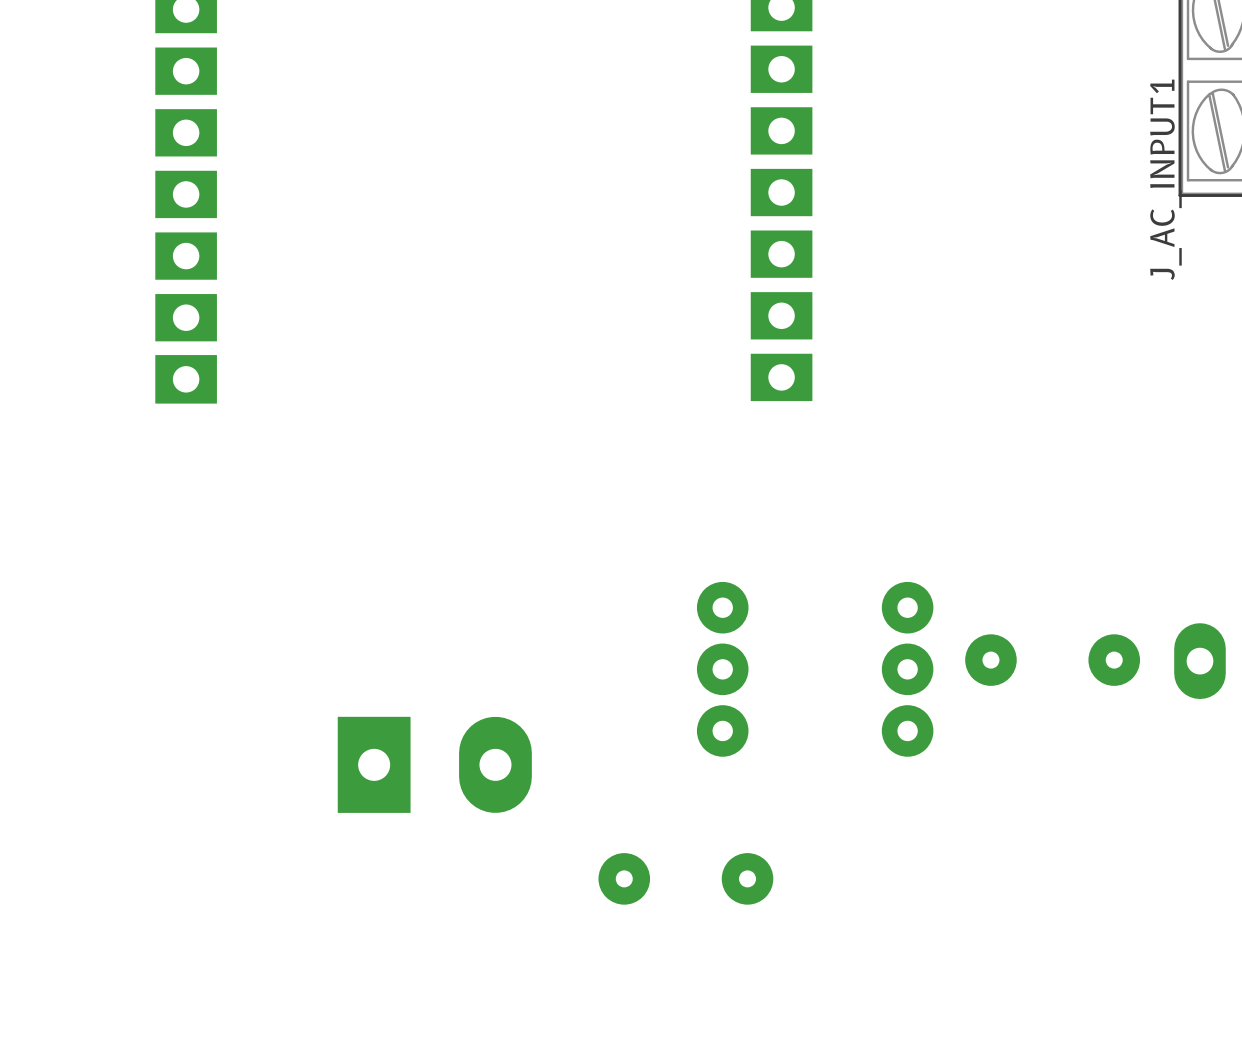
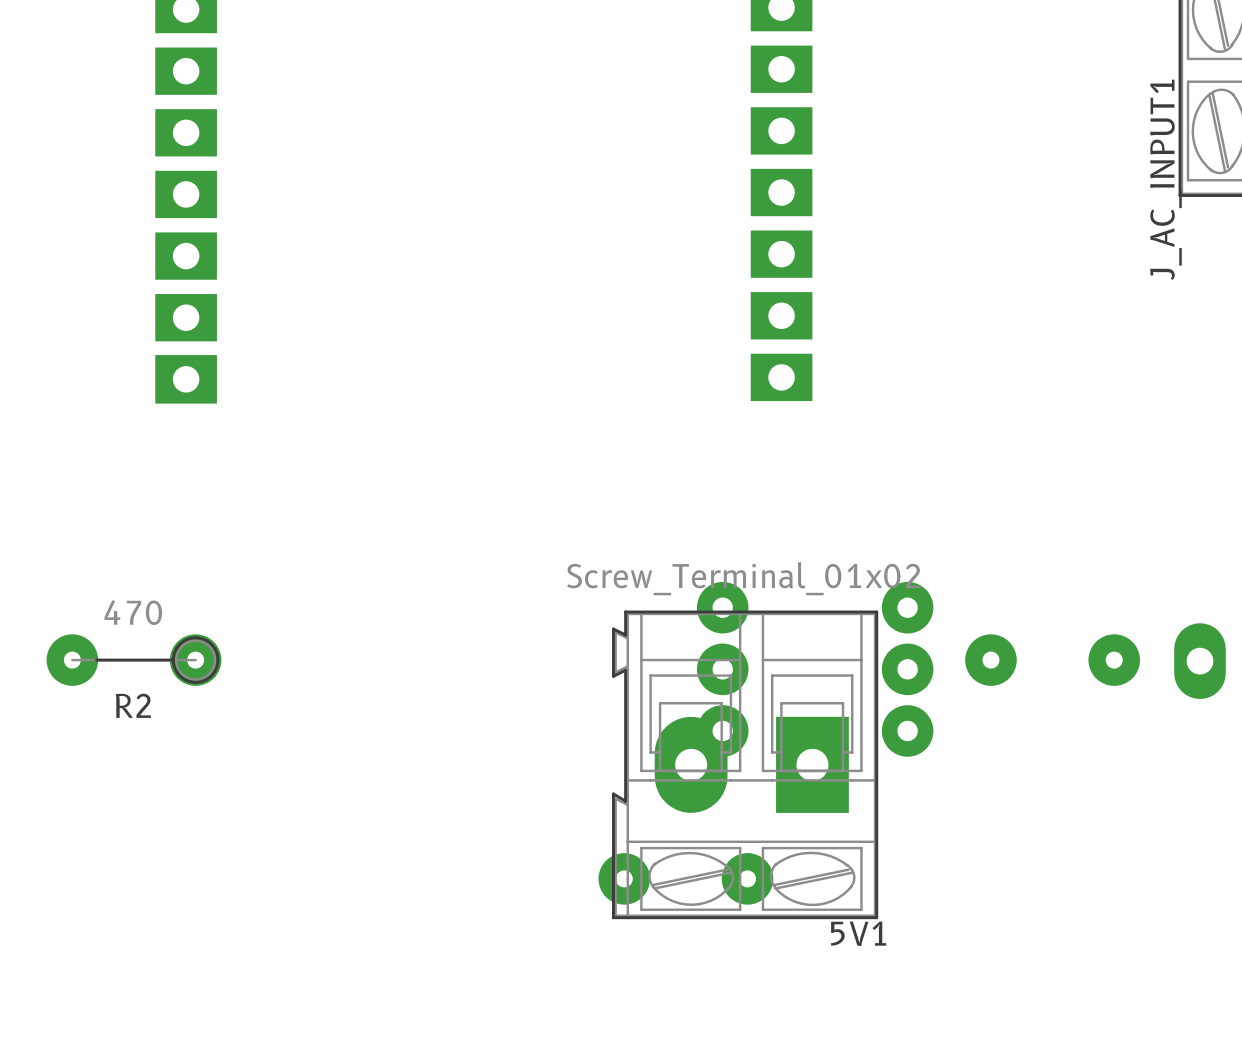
R2: none -> 470 (134, 660)
5V1 side: bottom (434, 764) -> top (745, 764)

